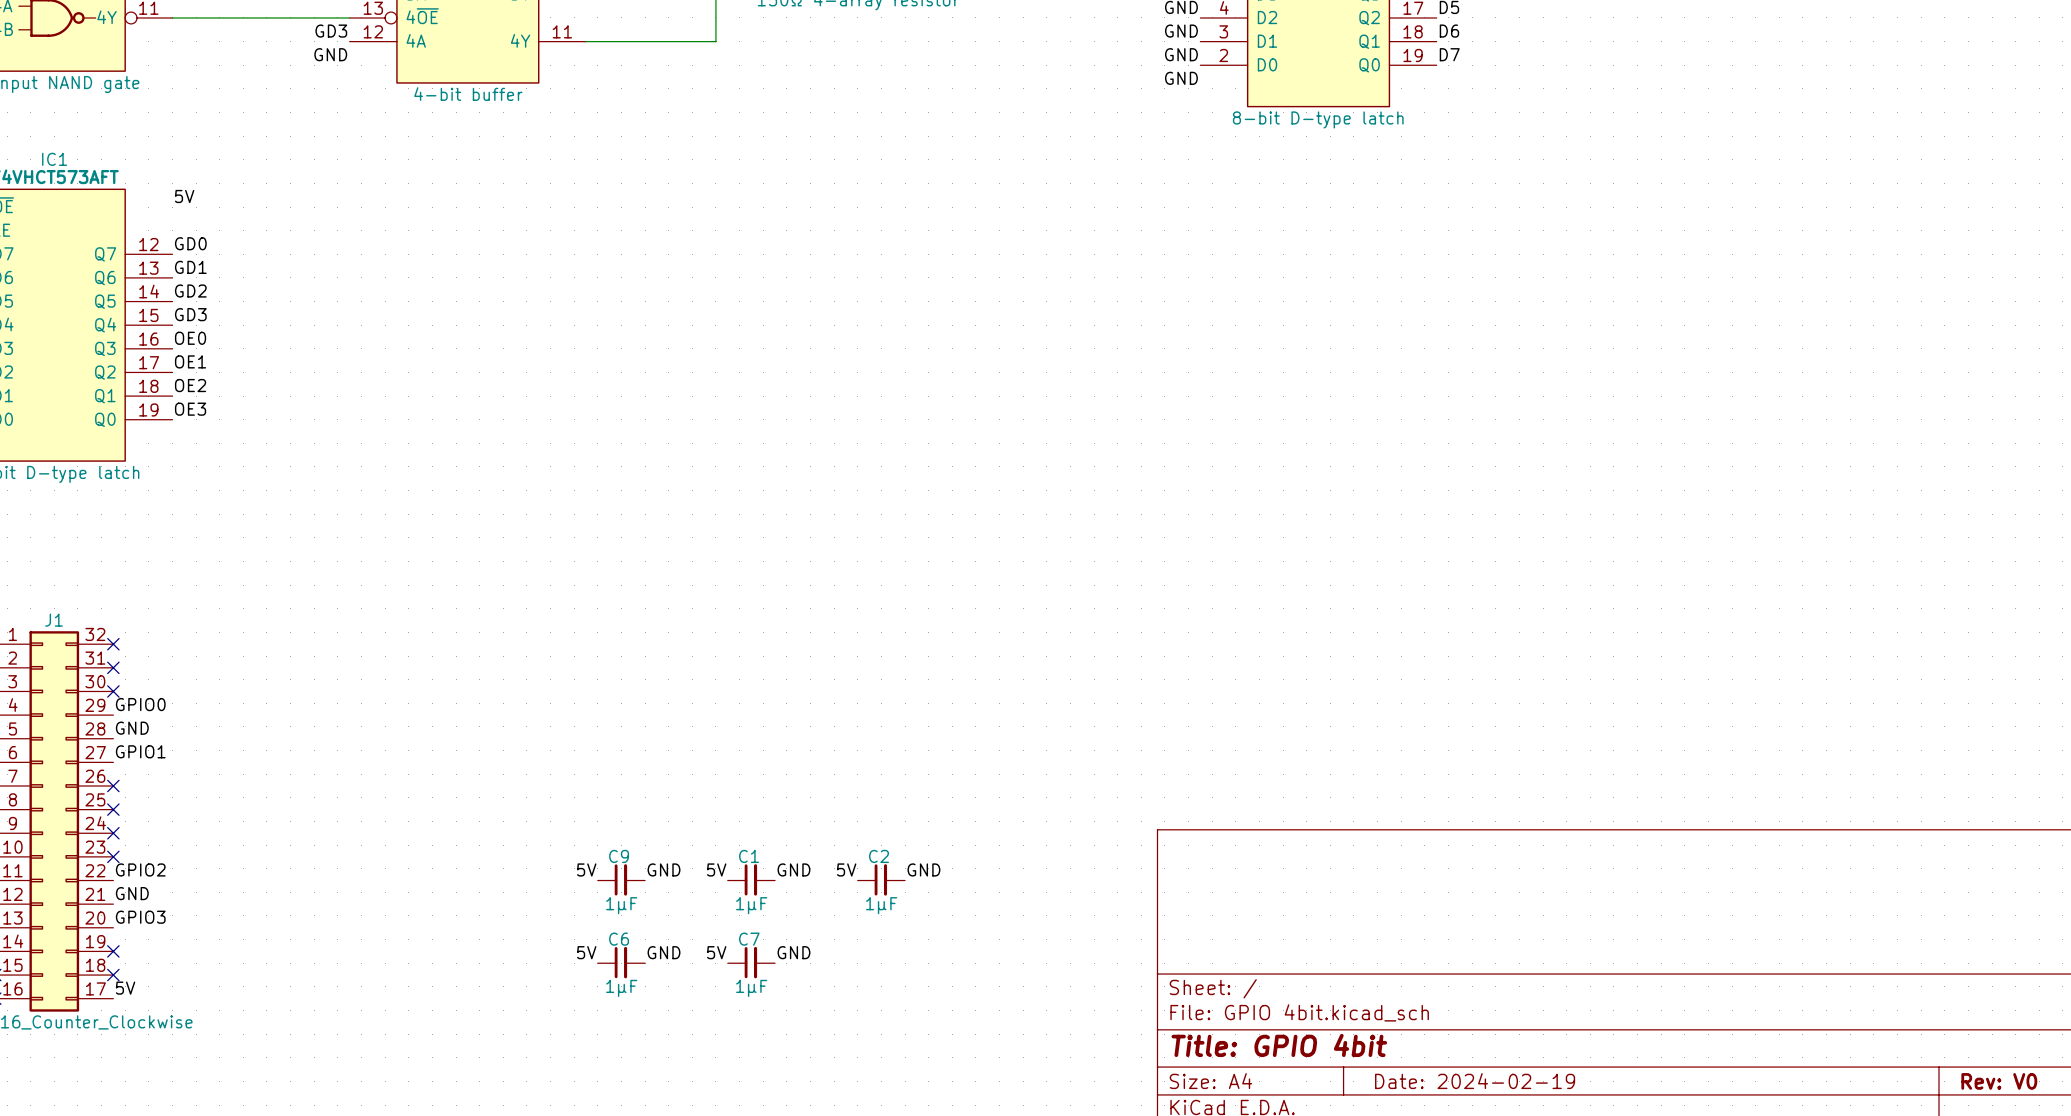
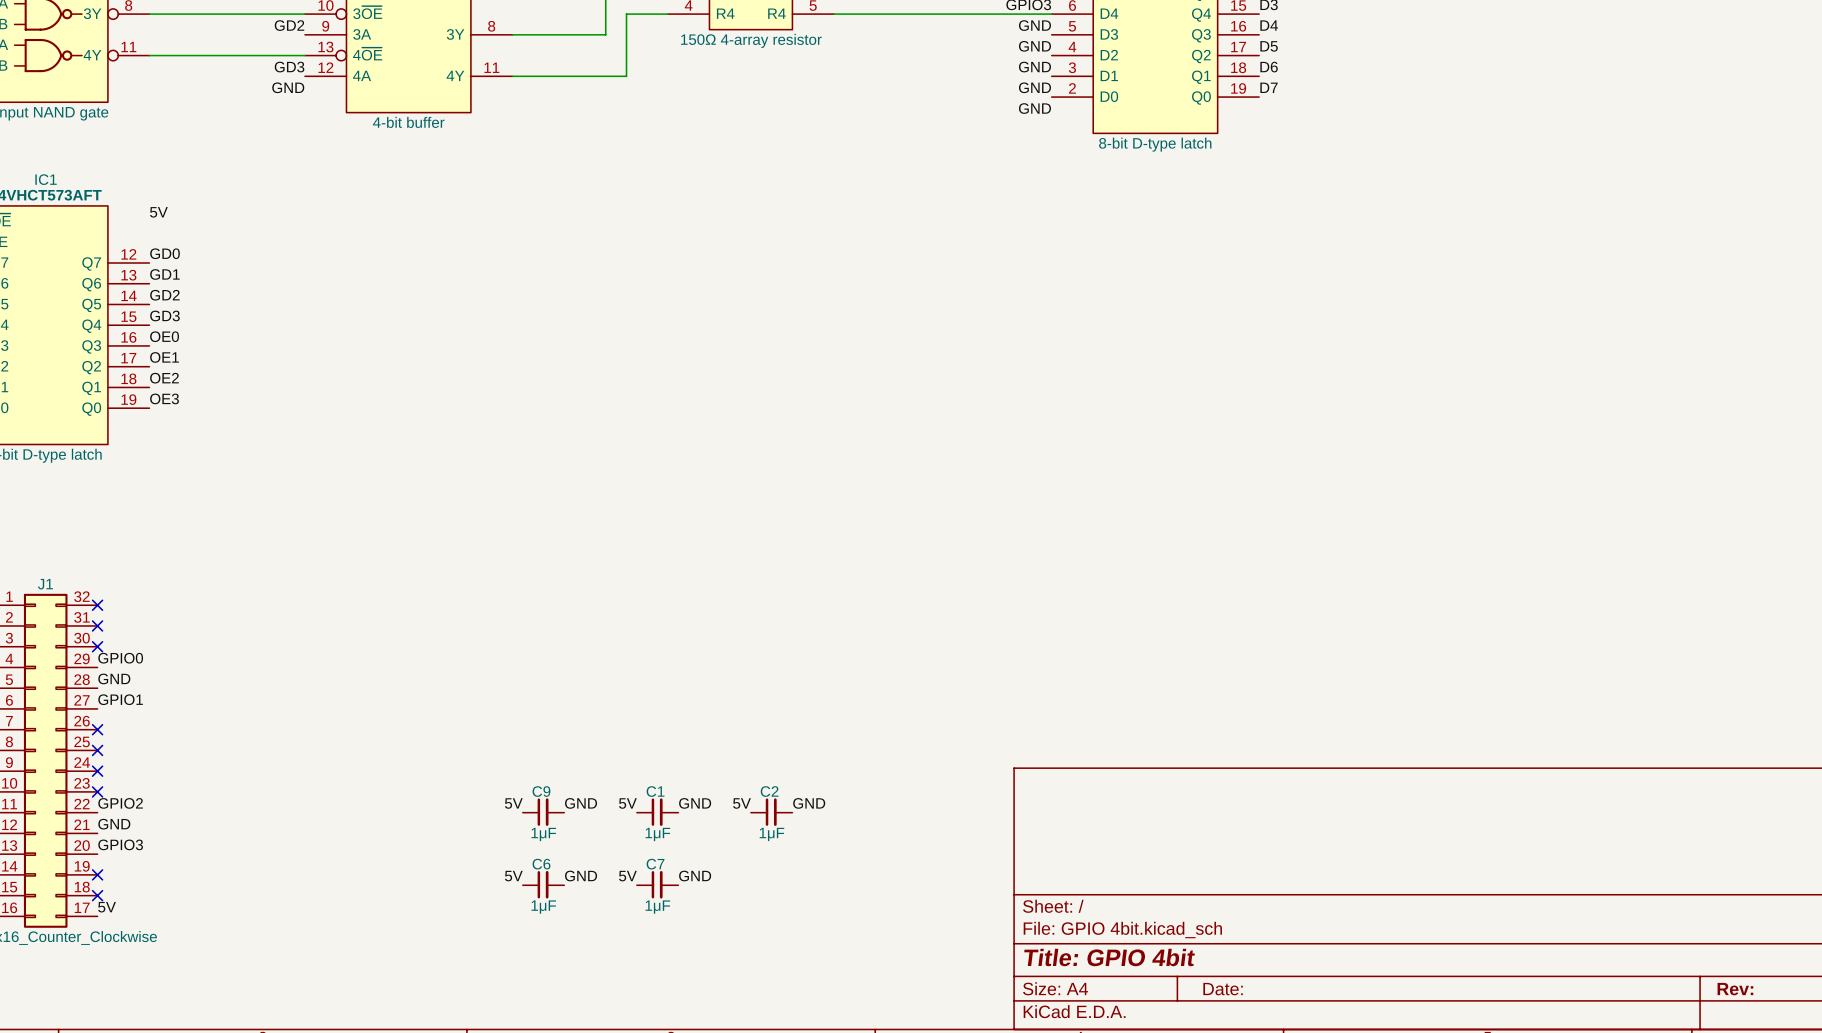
title block: Date: 2024-02-19 (1475, 1081) -> Date: (1223, 989)
title block: Rev: V0 (1999, 1081) -> Rev: (1735, 989)

